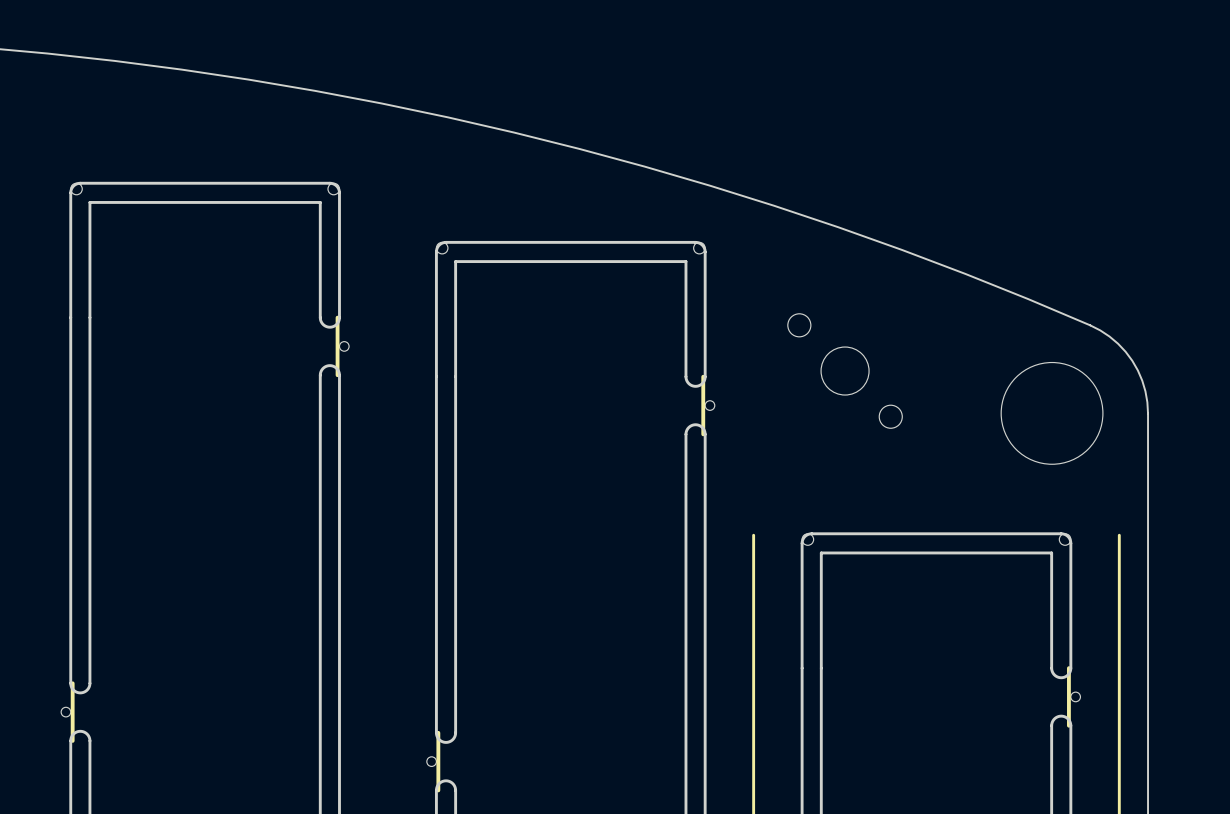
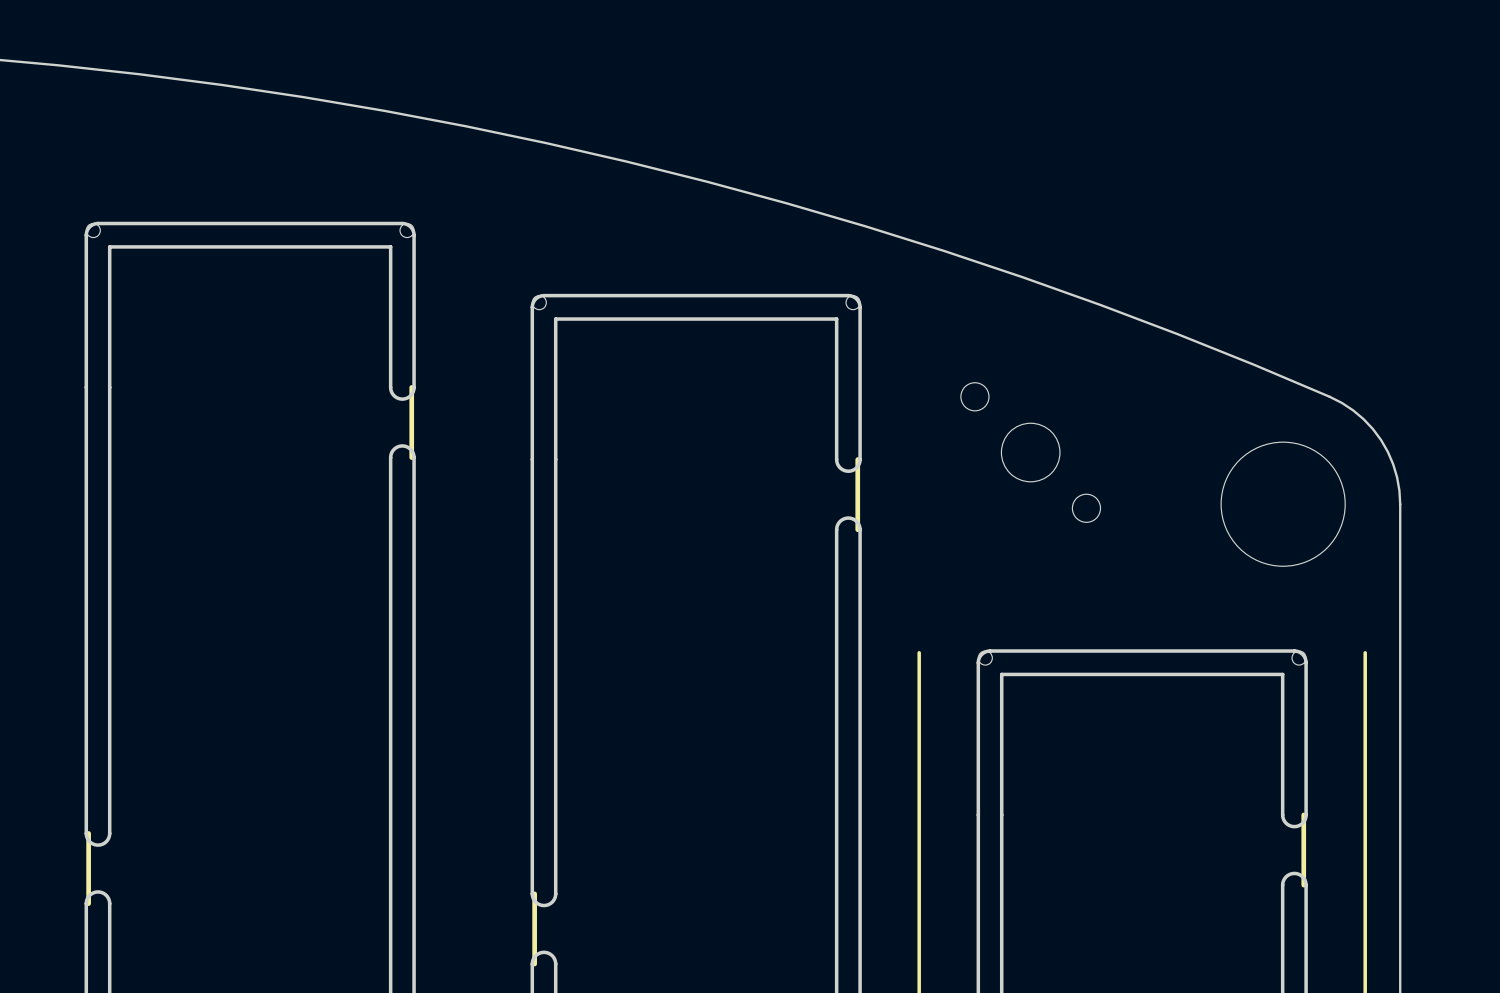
drawing: none -> [388, 385, 416, 460]
part: (333, 346) -> none
drawing: none -> [834, 457, 862, 533]
part: (699, 405) -> none
drawing: none -> [1280, 812, 1308, 888]
drawing: none -> [84, 831, 112, 906]
part: (1065, 696) -> none
part: (76, 712) -> none
drawing: none -> [530, 891, 558, 967]
part: (441, 761) -> none

